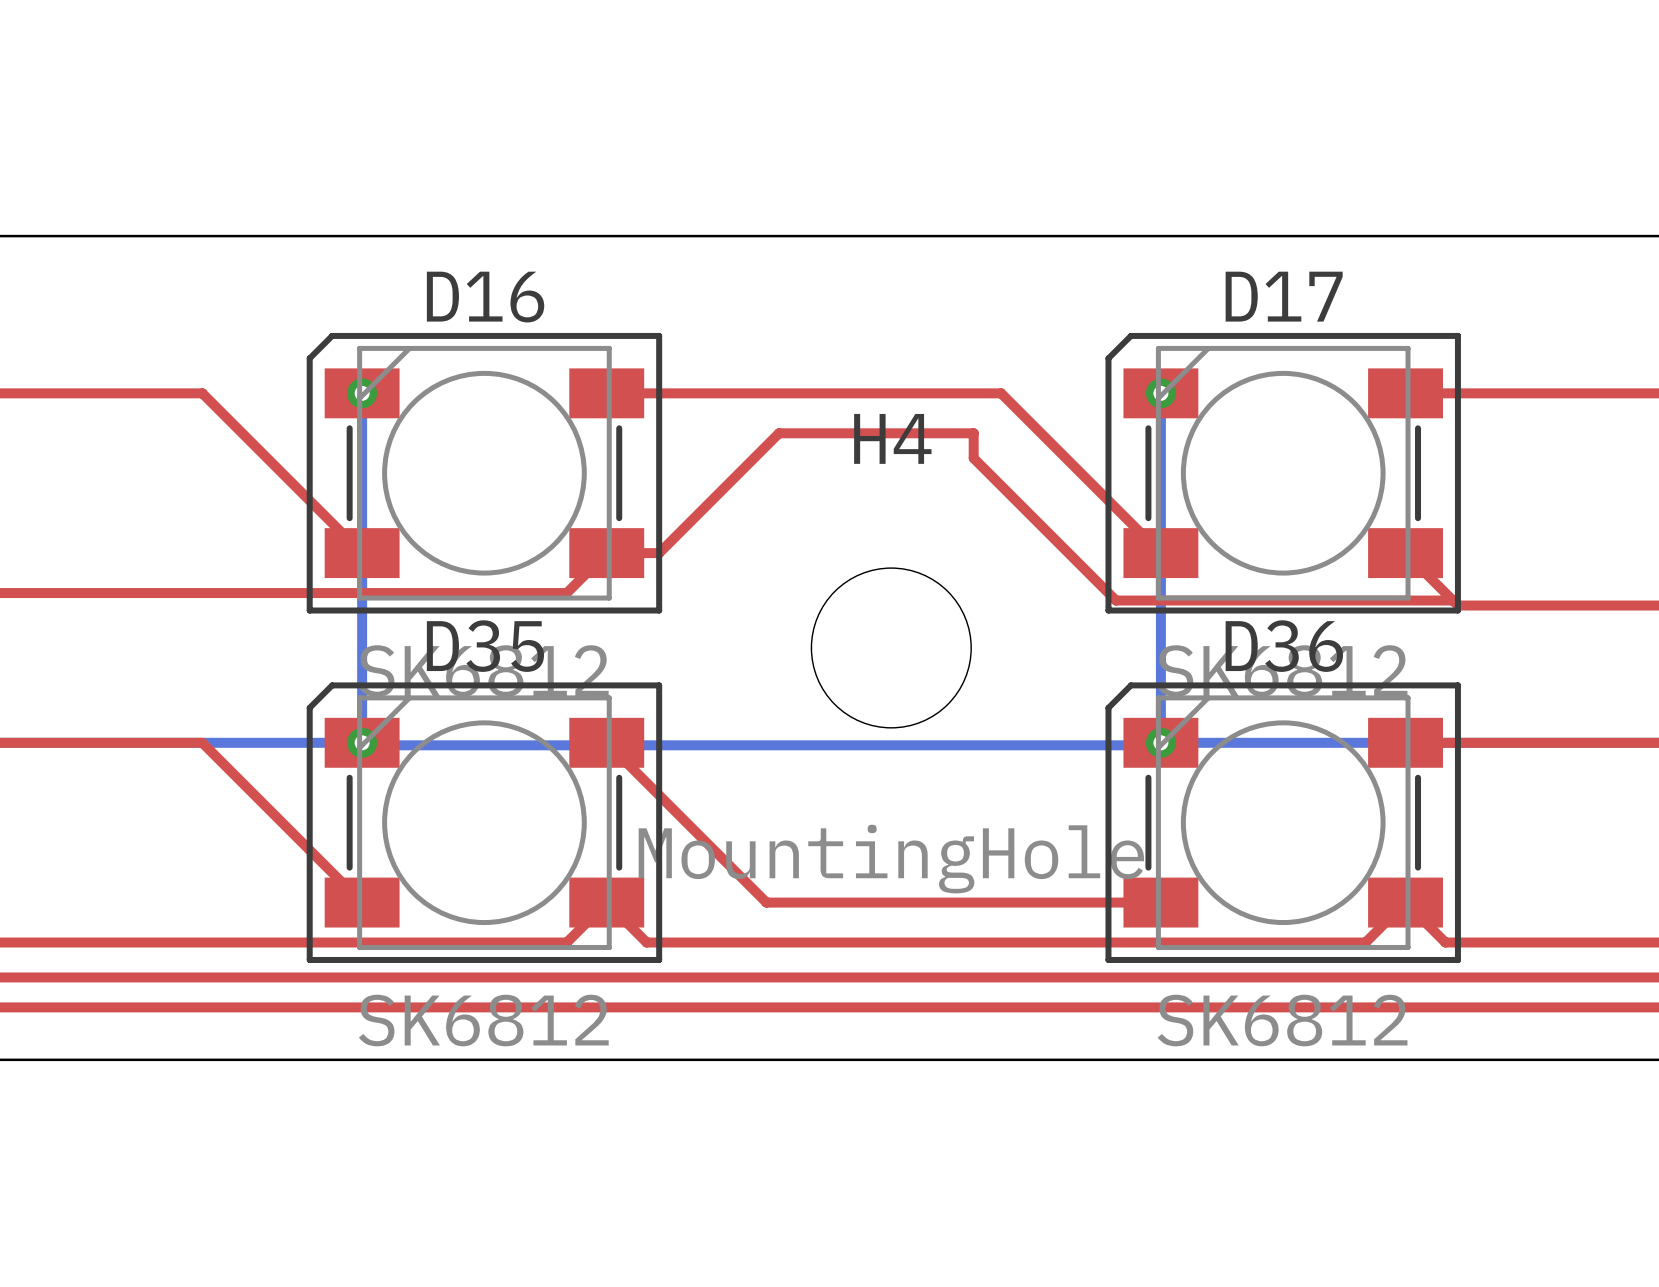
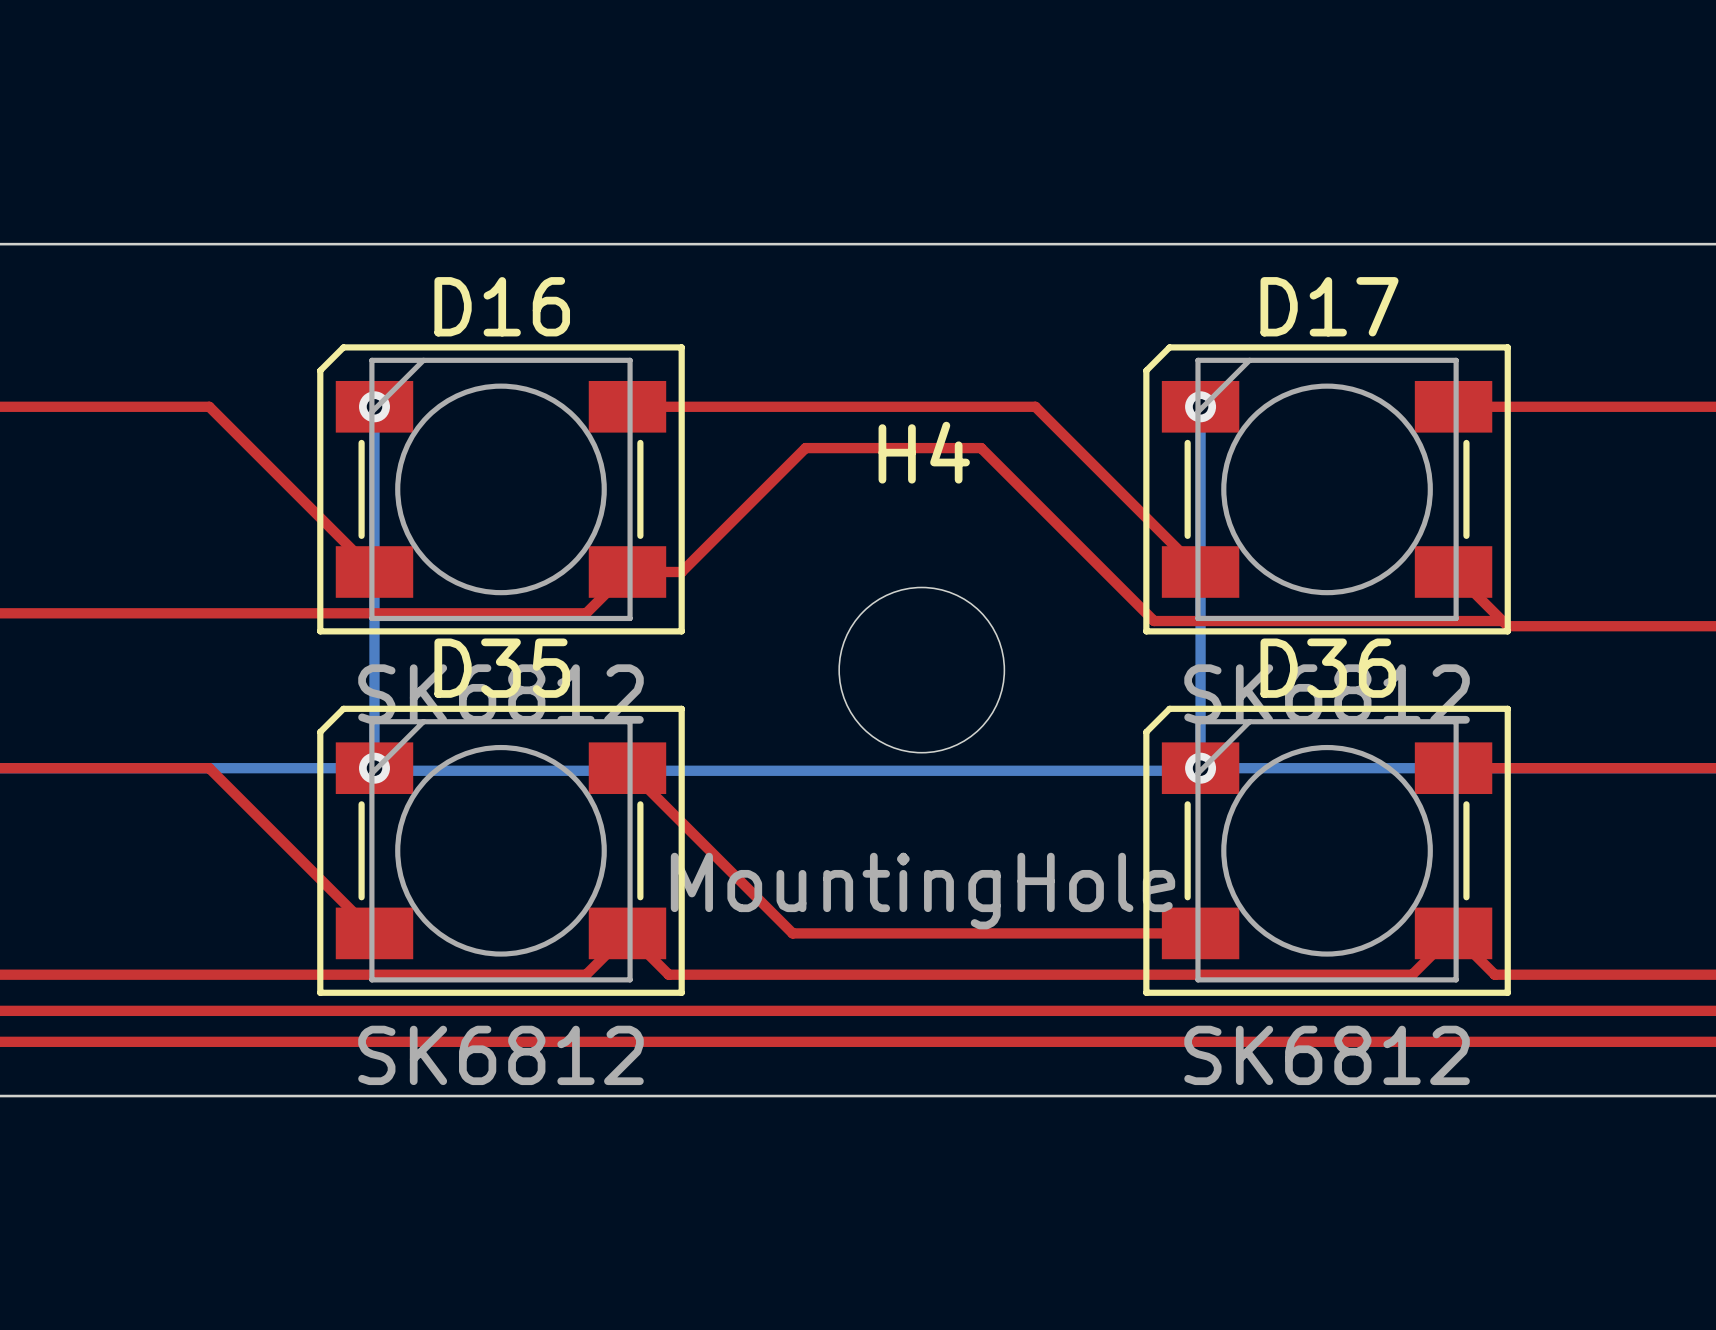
top track: (948, 433) (973, 433) (973, 458) -> (981, 448) (1006, 473)

